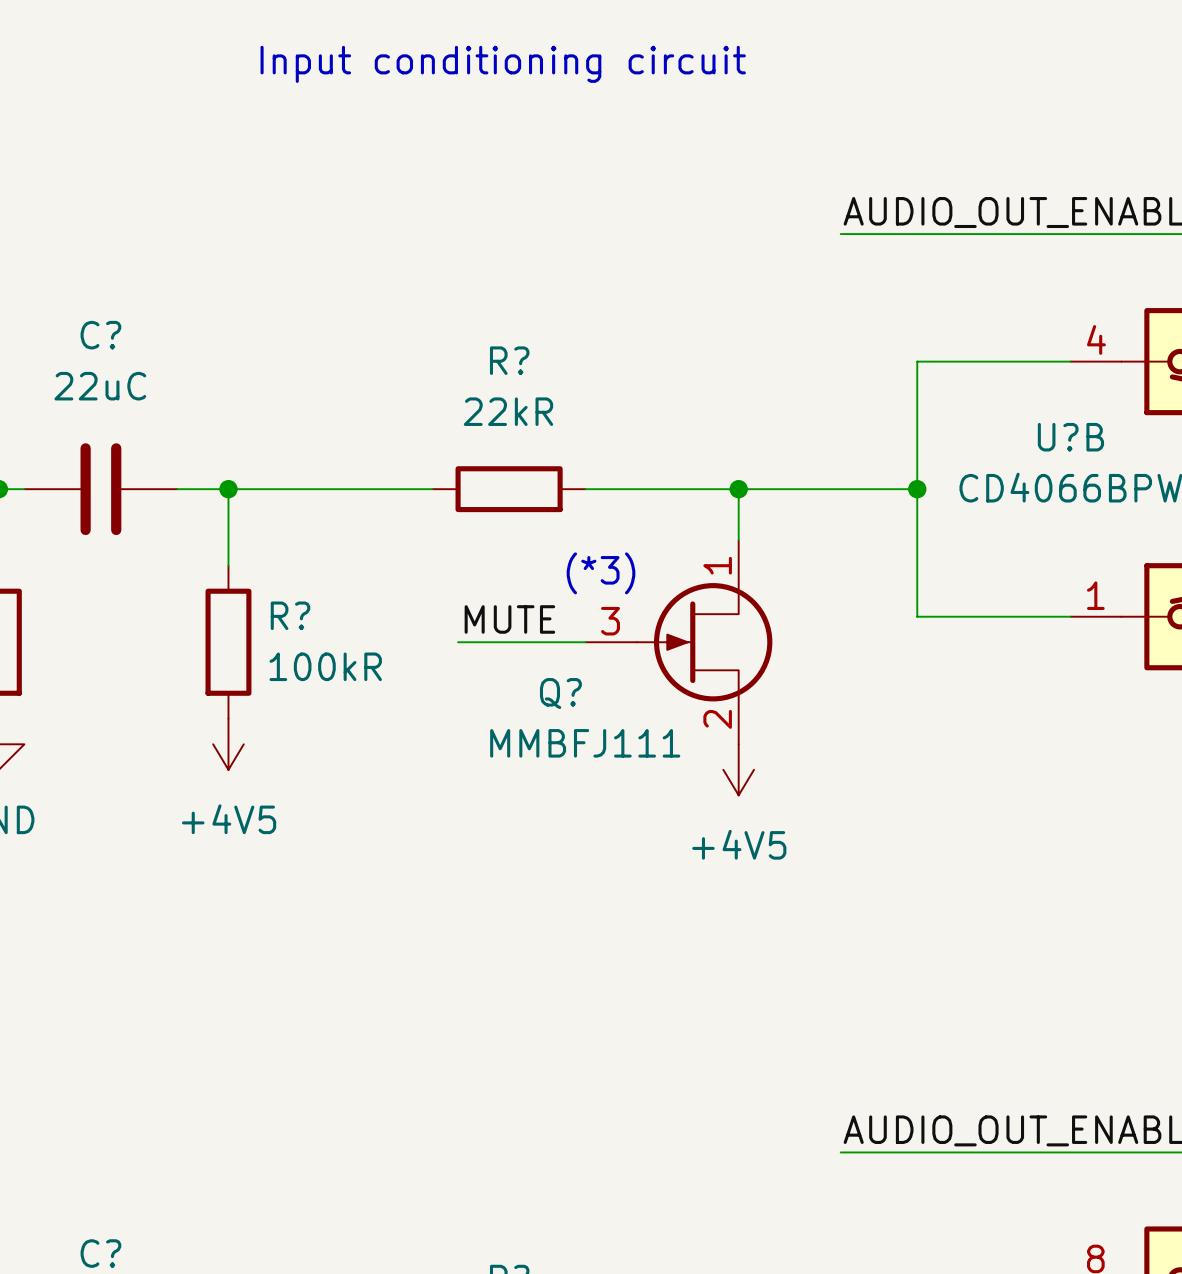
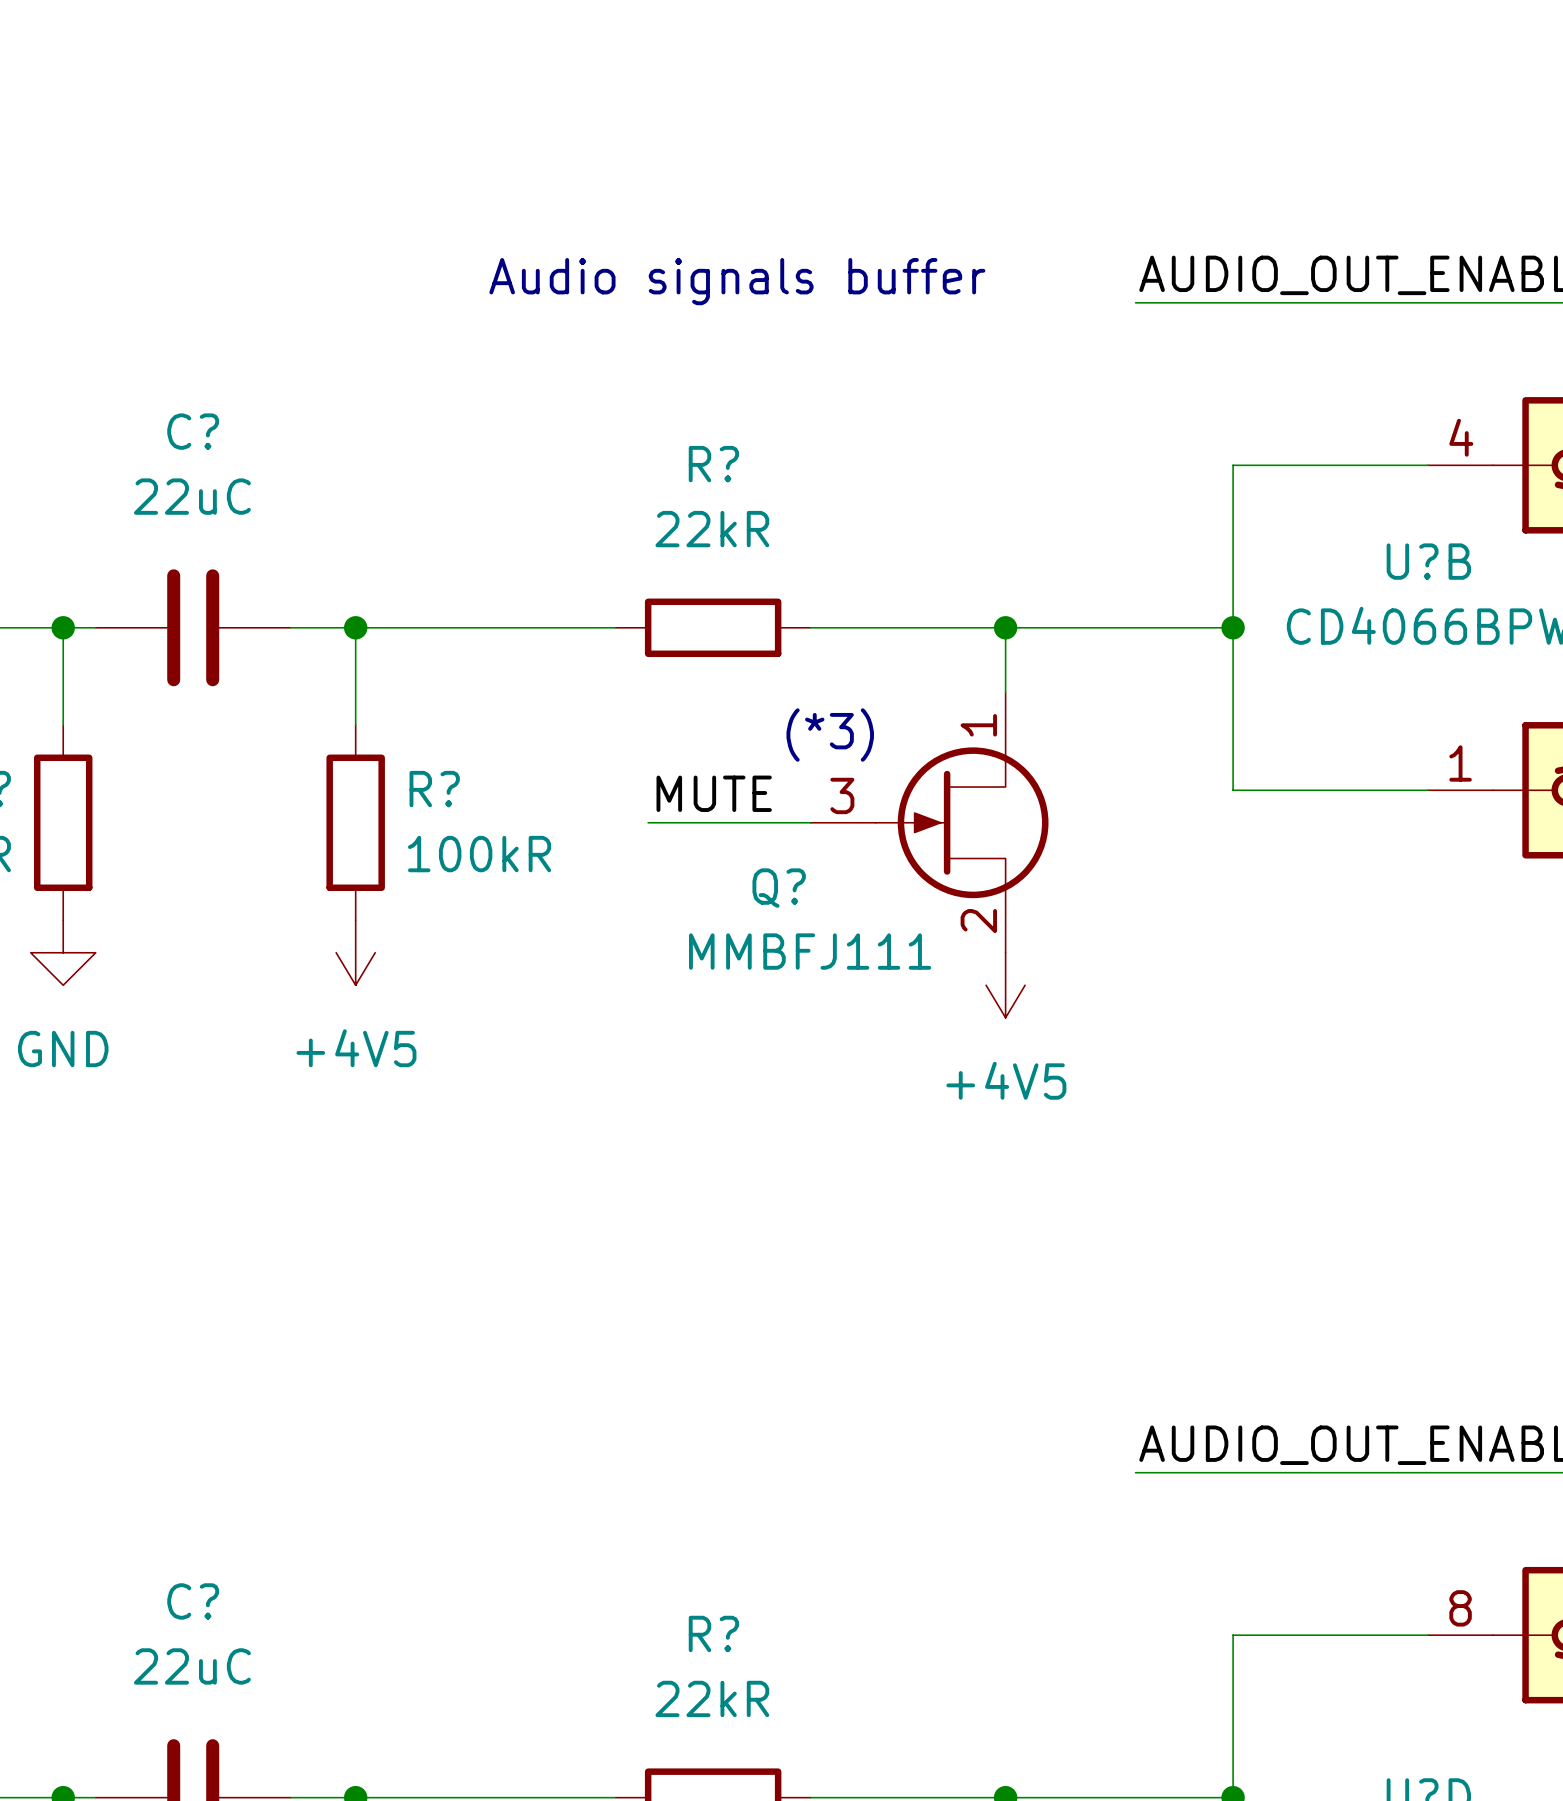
text: Input conditioning circuit (503, 64) -> none
text: none -> Audio signals buffer (737, 281)

